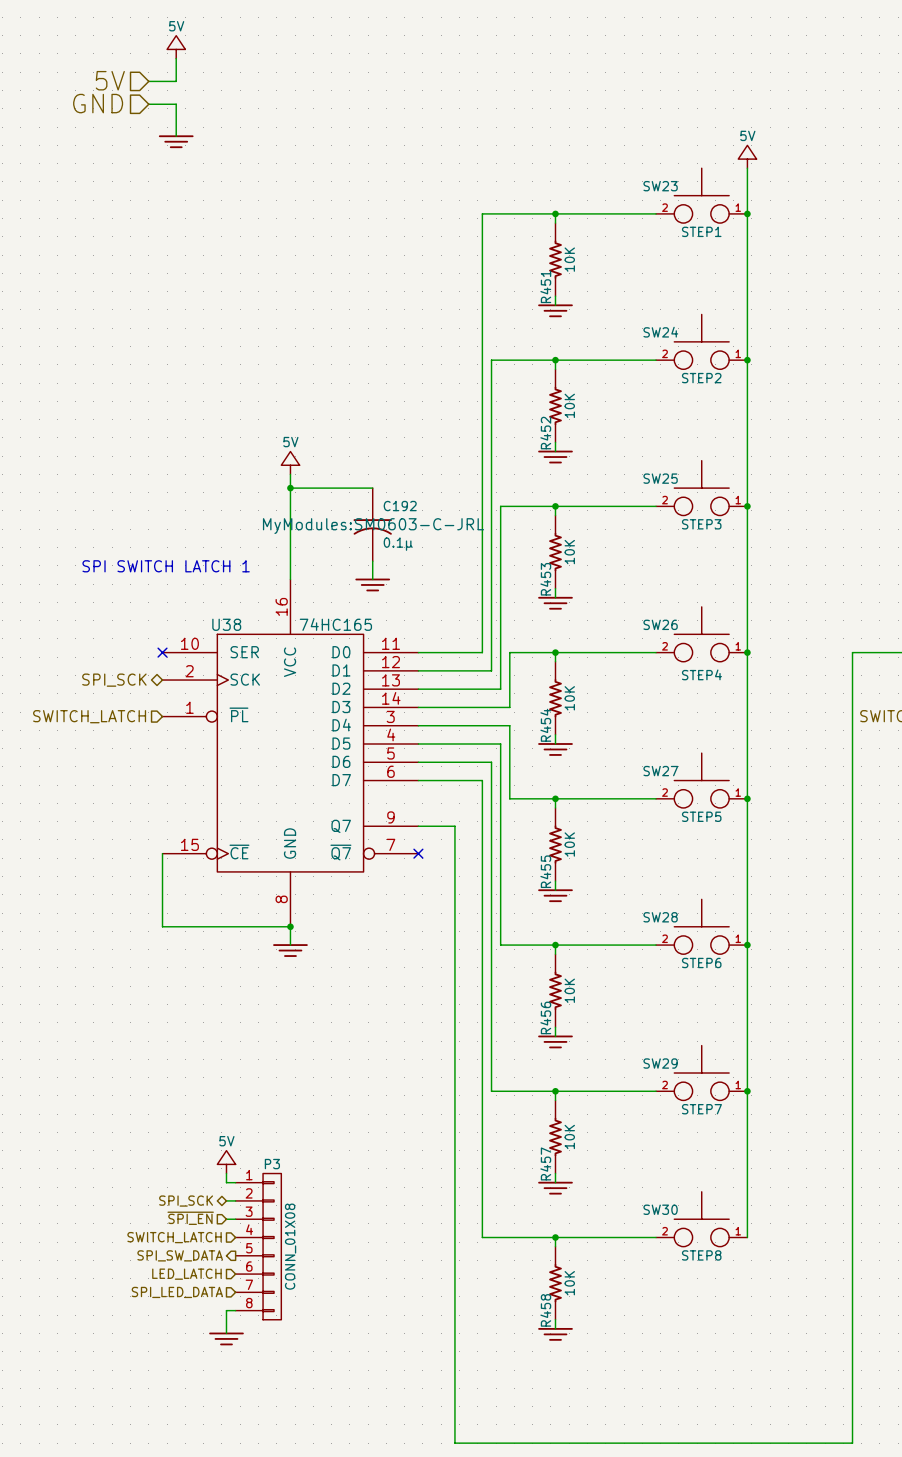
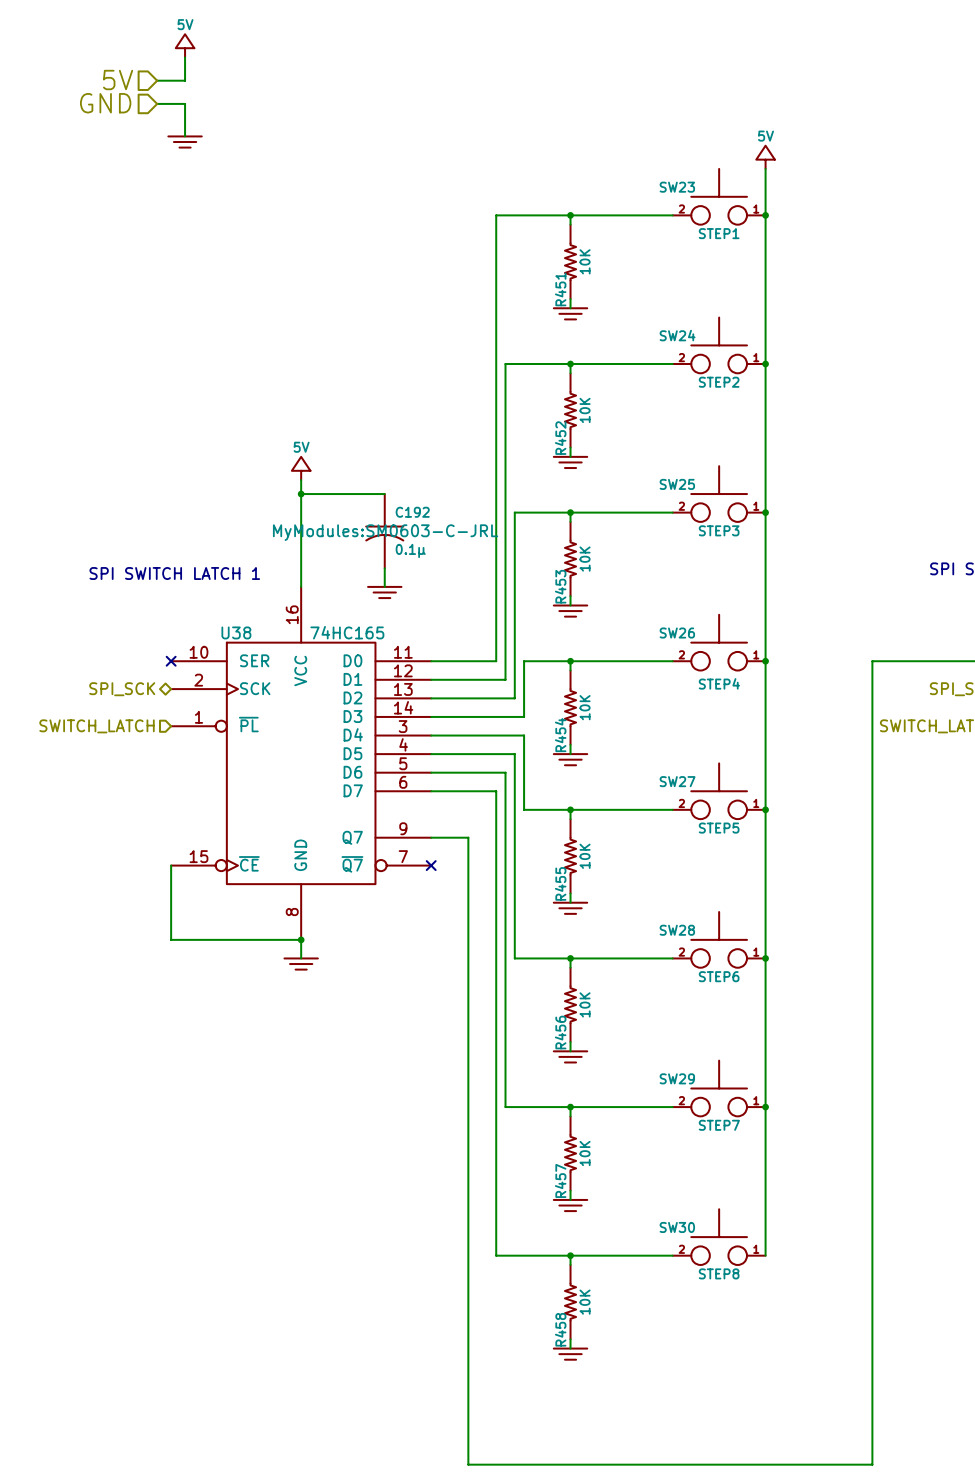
power symbol: 5V (226, 1162) -> none
wire: (226, 1173) (226, 1182) (235, 1182) -> none
wire: (226, 1200) (235, 1200) -> none
hierarchical label: SPI_SCK (186, 1201) -> none
hierarchical label: ~{SPI_EN} (190, 1218) -> none
wire: (226, 1219) (235, 1219) -> none
hierarchical label: SWITCH_LATCH (174, 1237) -> none
P3: CONN_01X08 (258, 1246) -> none
hierarchical label: SPI_SW_DATA (180, 1255) -> none
hierarchical label: LED_LATCH (186, 1274) -> none
hierarchical label: SPI_LED_DATA (177, 1292) -> none
wire: (235, 1310) (226, 1310) (226, 1333) -> none
power symbol: (226, 1338) -> none

